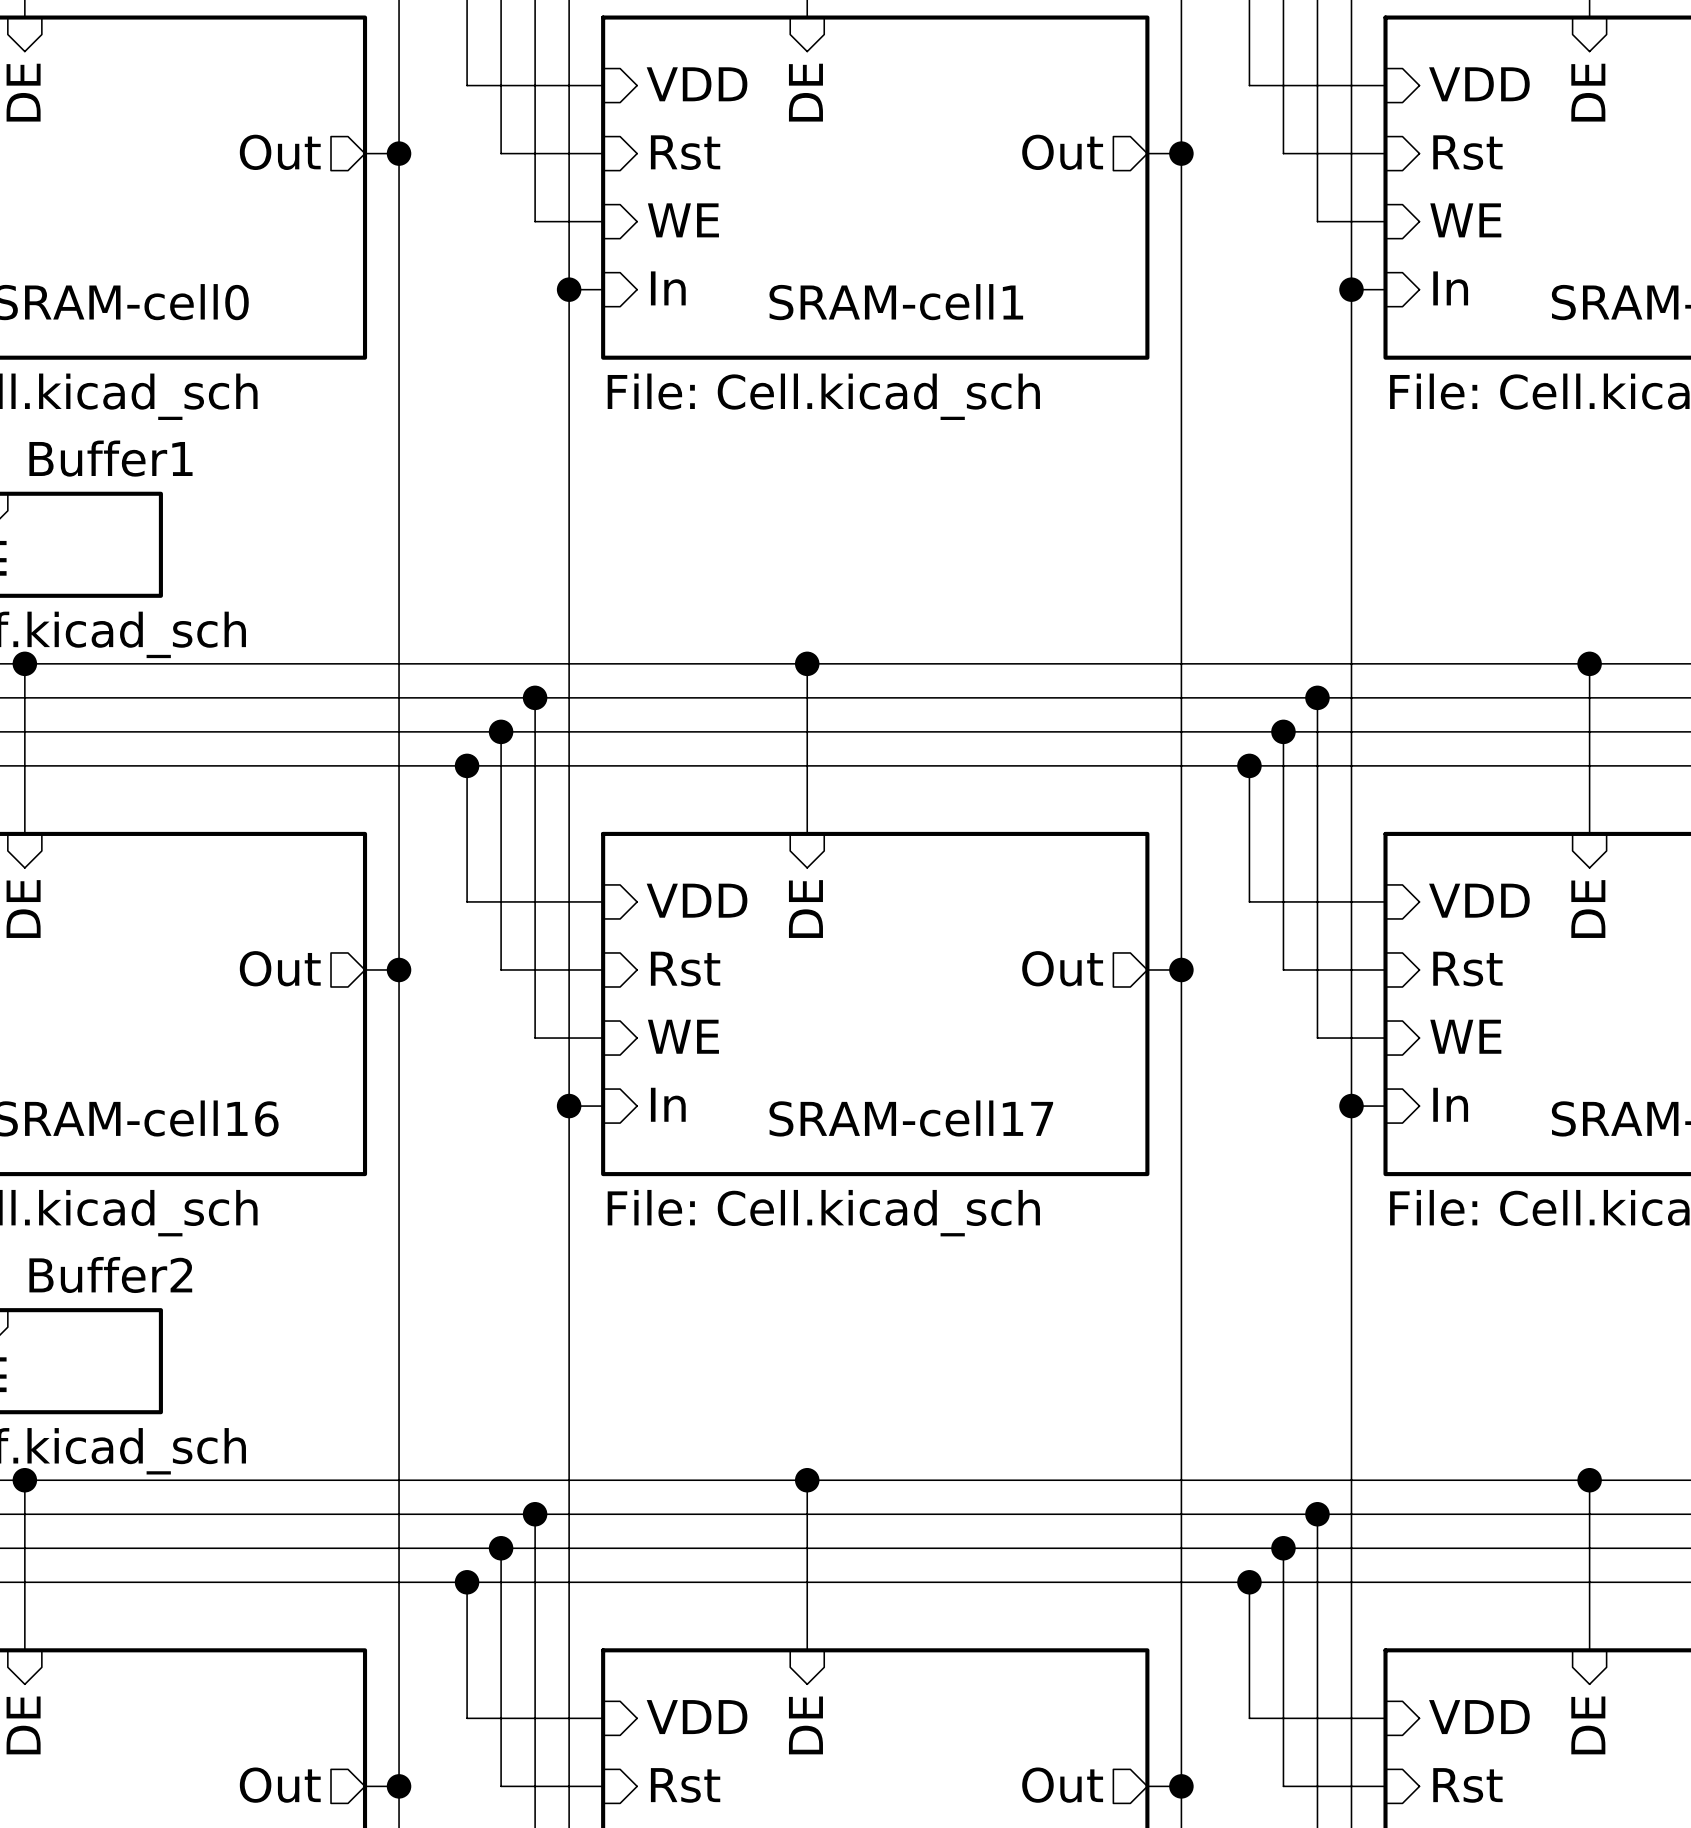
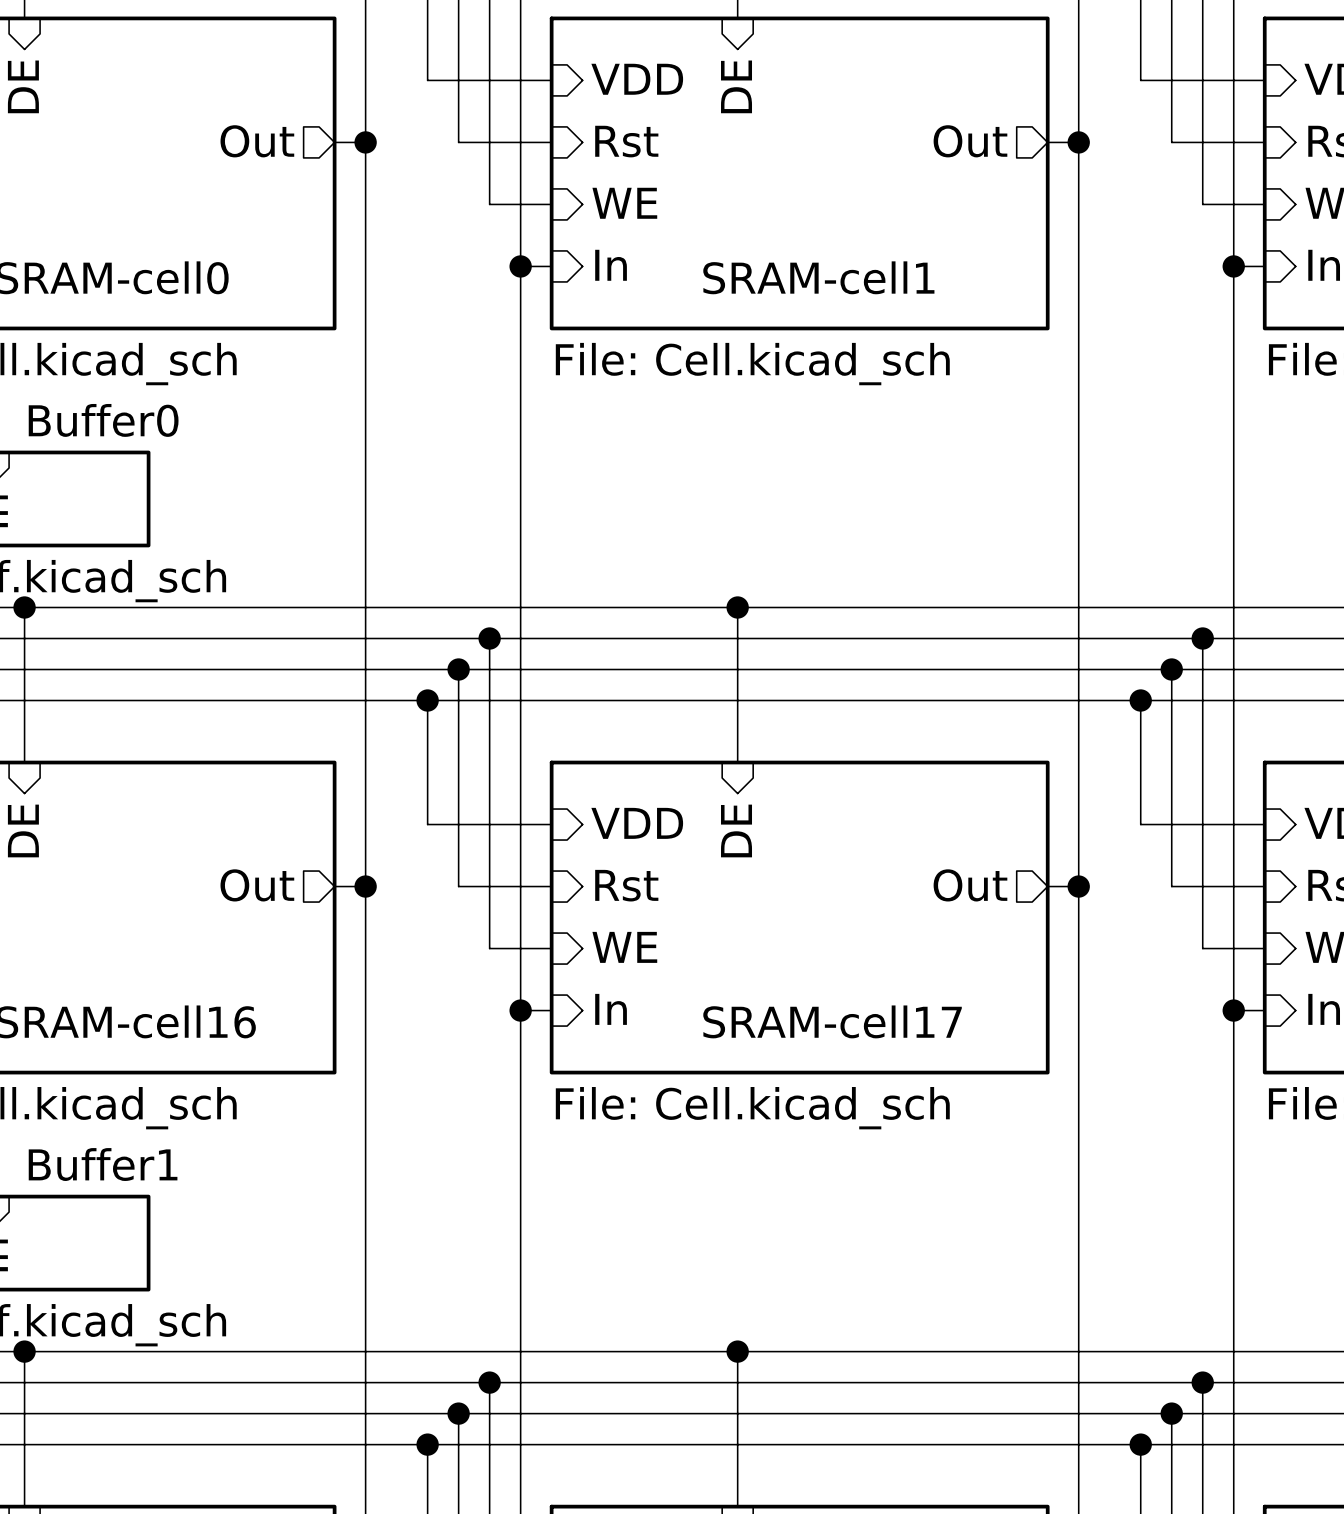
sheet Buffer1 name: Buffer1 (110, 458) -> Buffer0 (103, 420)
sheet Buffer2 name: Buffer2 (110, 1274) -> Buffer1 (103, 1164)

